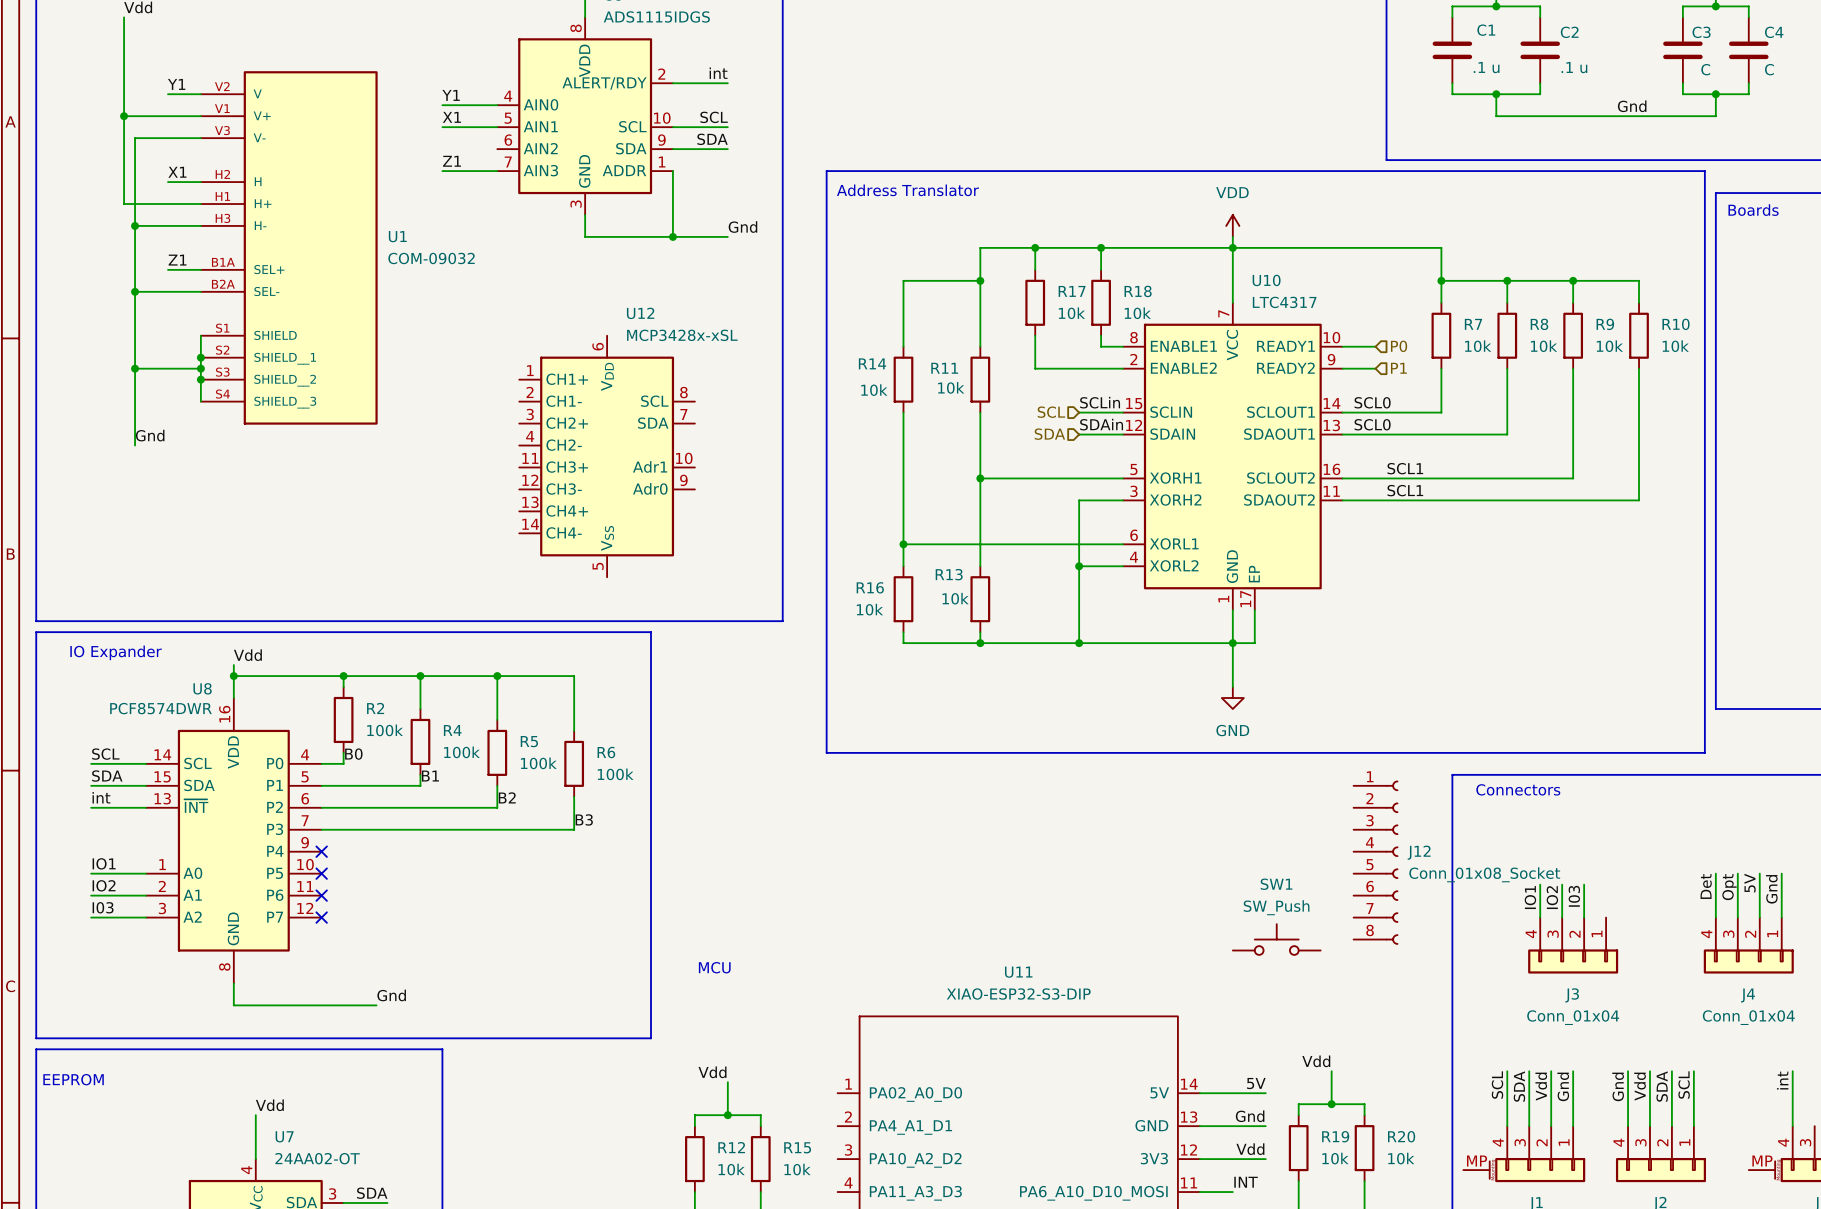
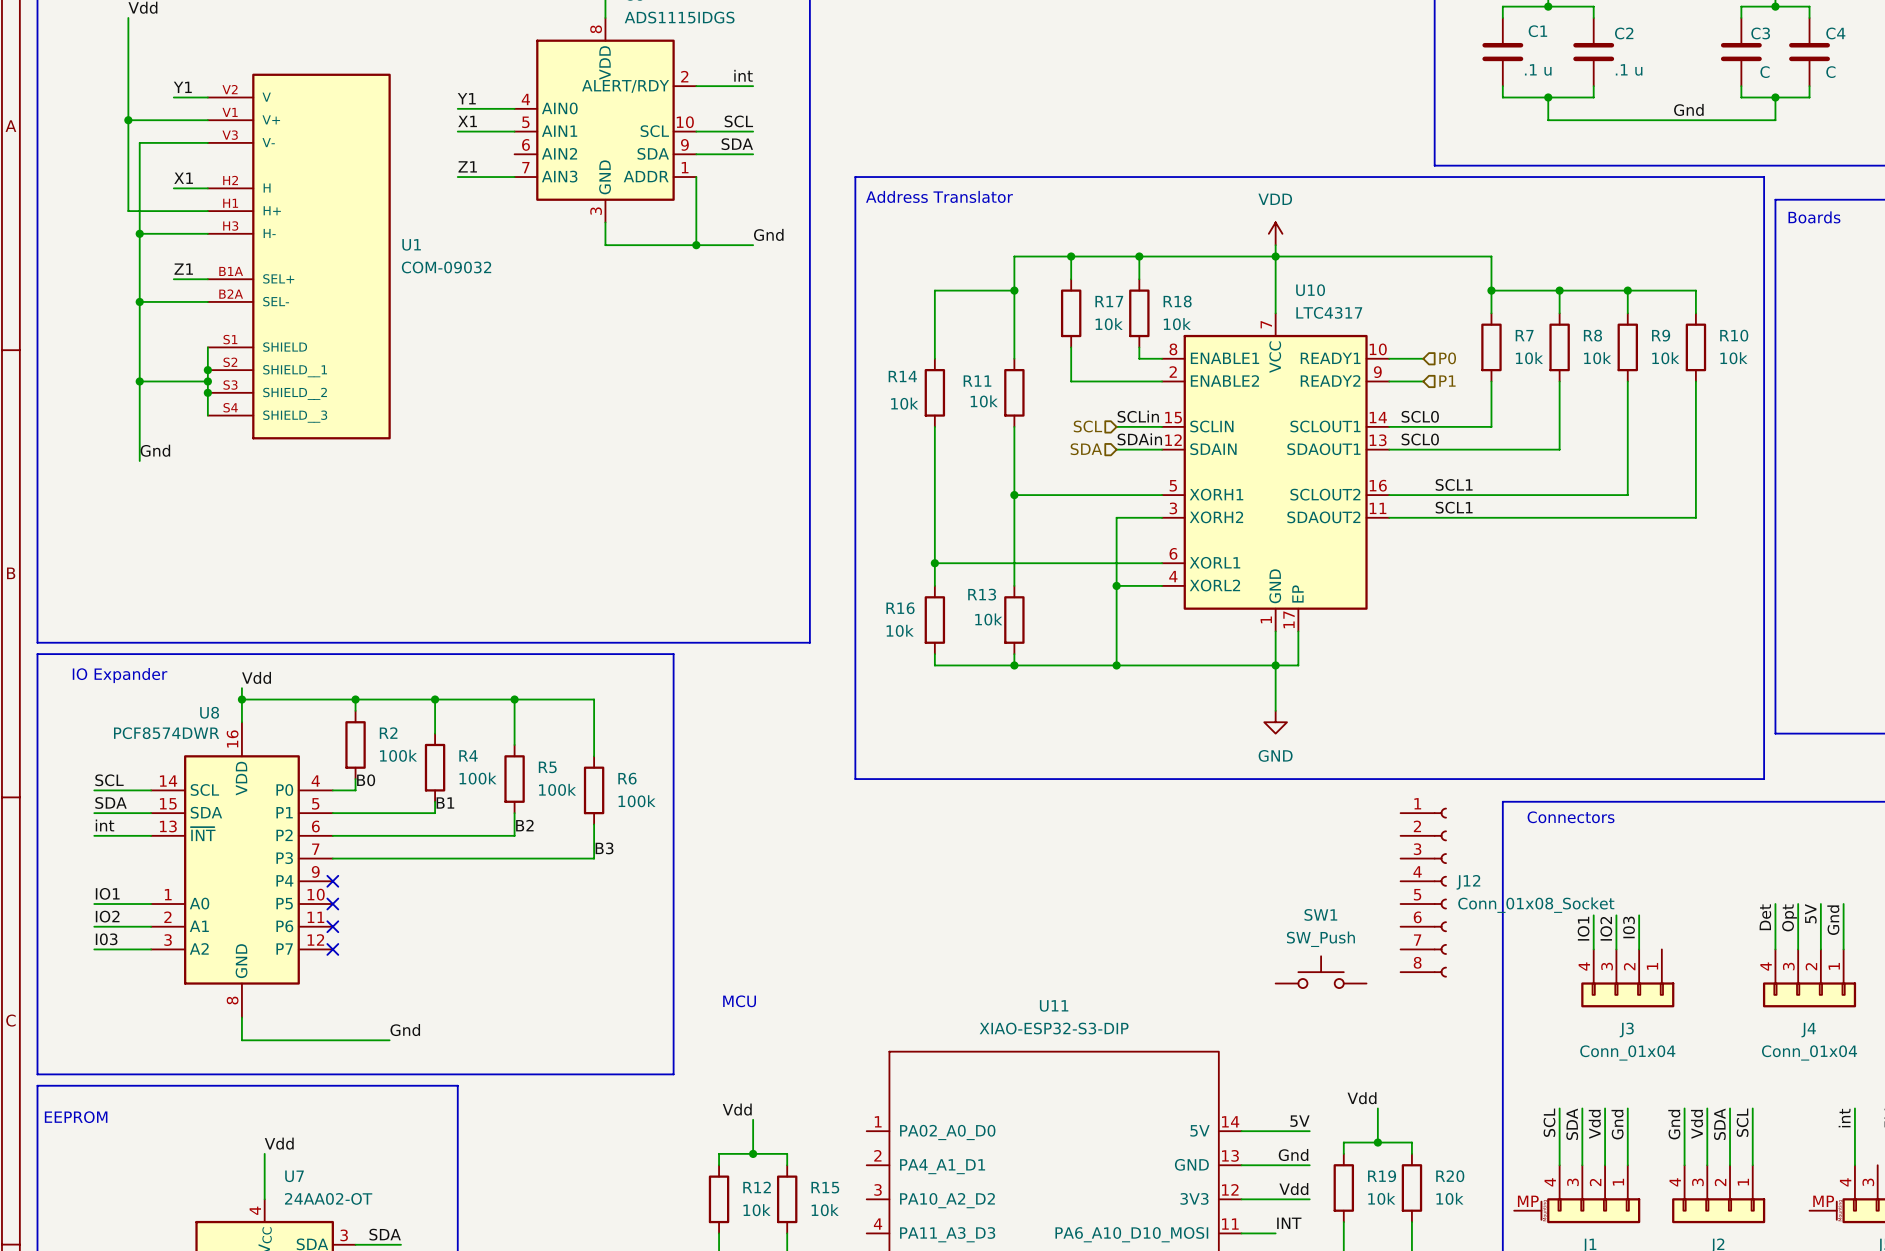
U12: MCP3428x-xSL (607, 456) -> none

